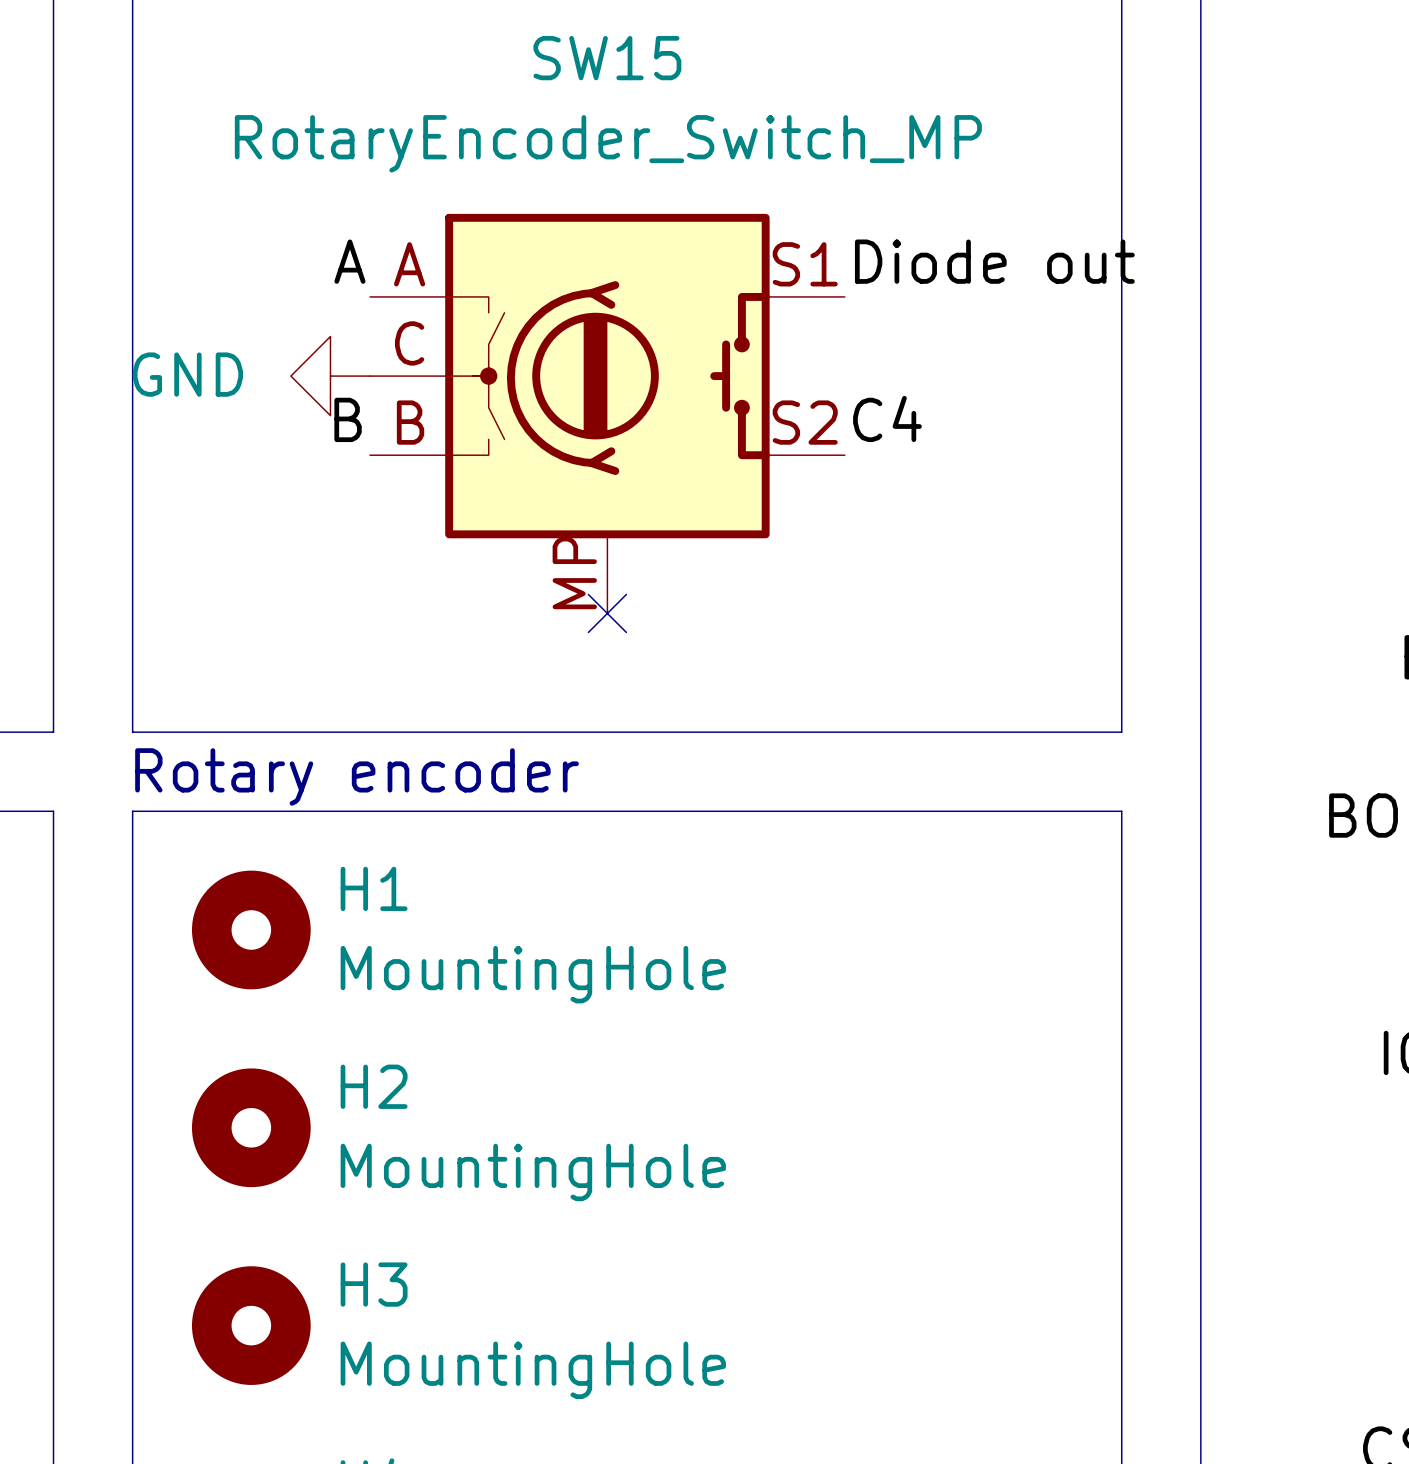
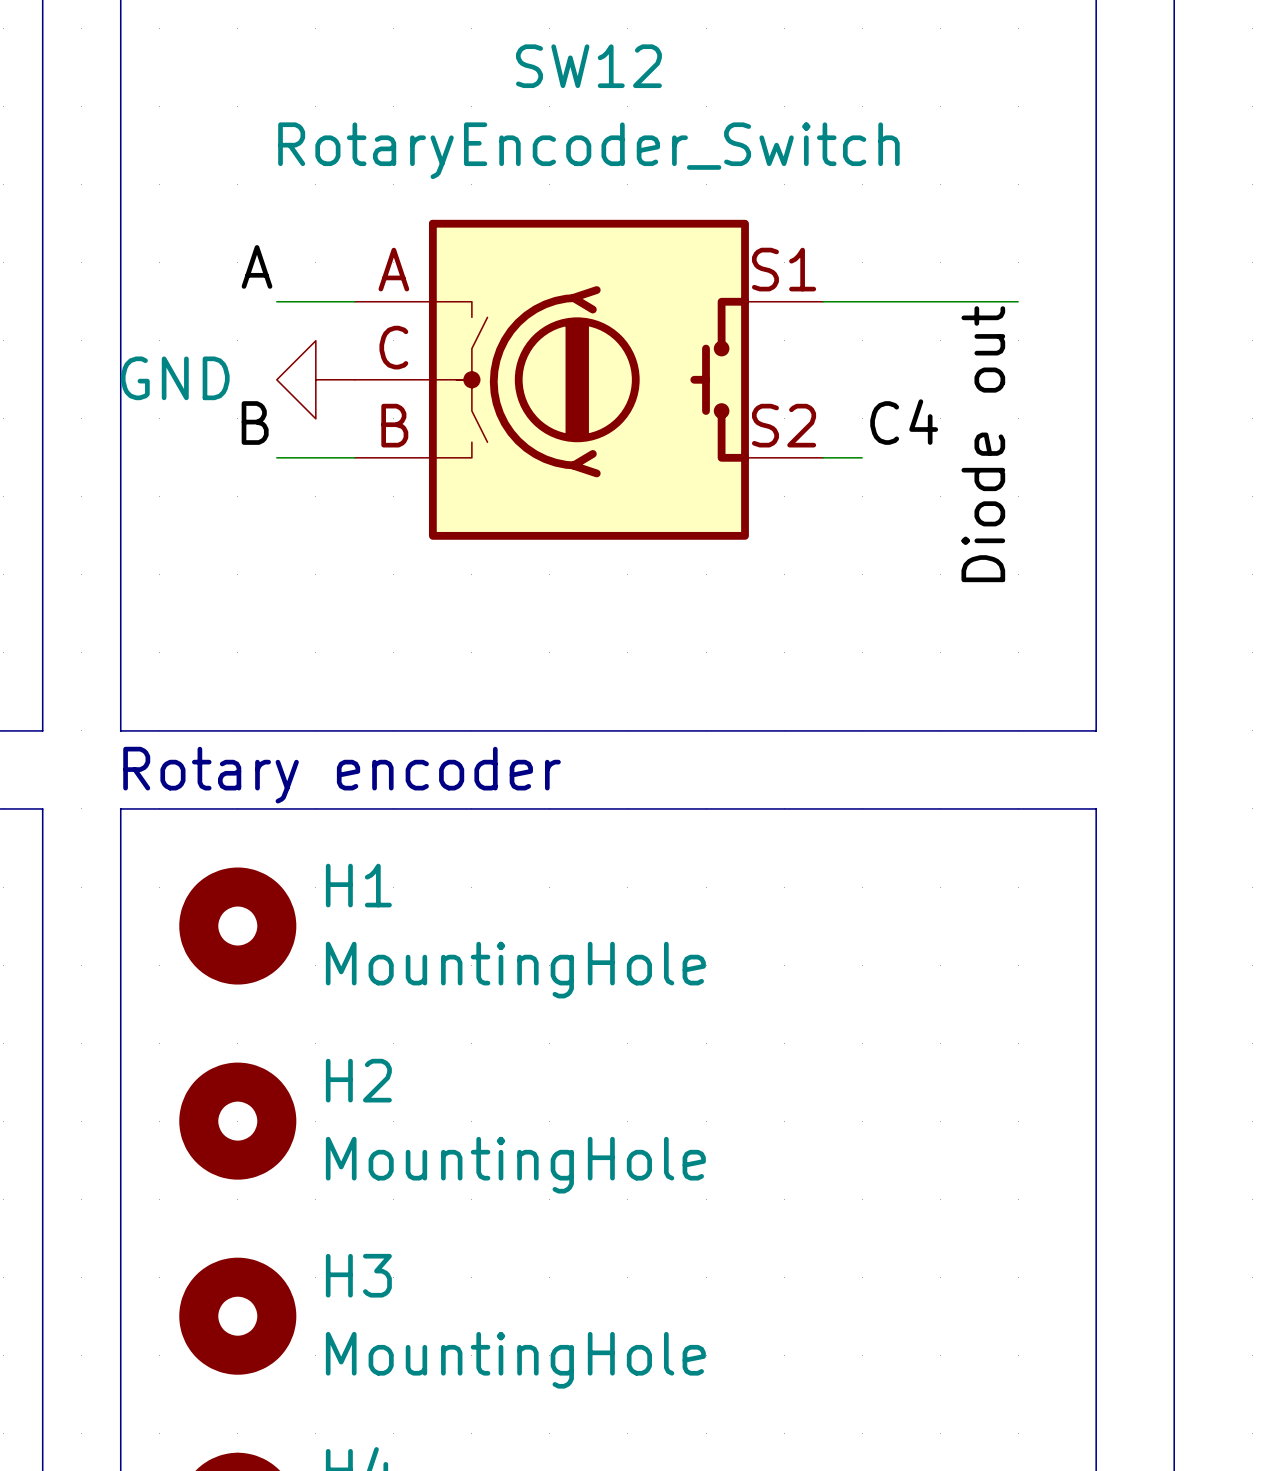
label position: A (349, 261) -> A (257, 266)
label rotation: 0° (994, 261) -> 90° counterclockwise (983, 444)
wire: none -> (276, 301) (354, 301)
wire: none -> (823, 301) (1018, 301)
SW12: none -> RotaryEncoder_Switch (588, 379)
SW15: RotaryEncoder_Switch_MP (607, 413) -> none
label position: C4 (887, 418) -> C4 (904, 422)
label position: B (348, 419) -> B (255, 423)
wire: none -> (276, 457) (354, 457)
wire: none -> (823, 457) (862, 457)
no-connect mark: (607, 613) -> none

